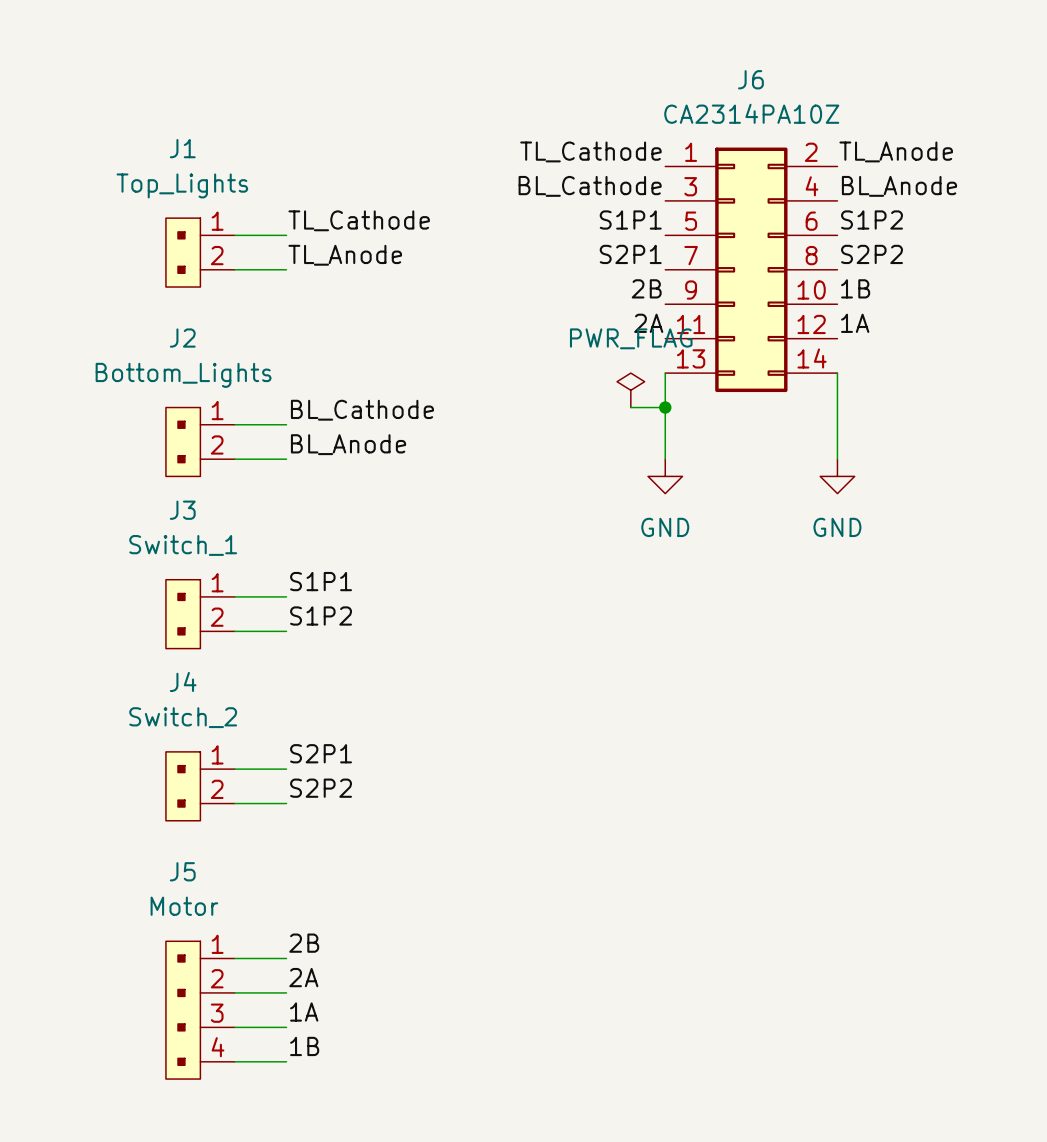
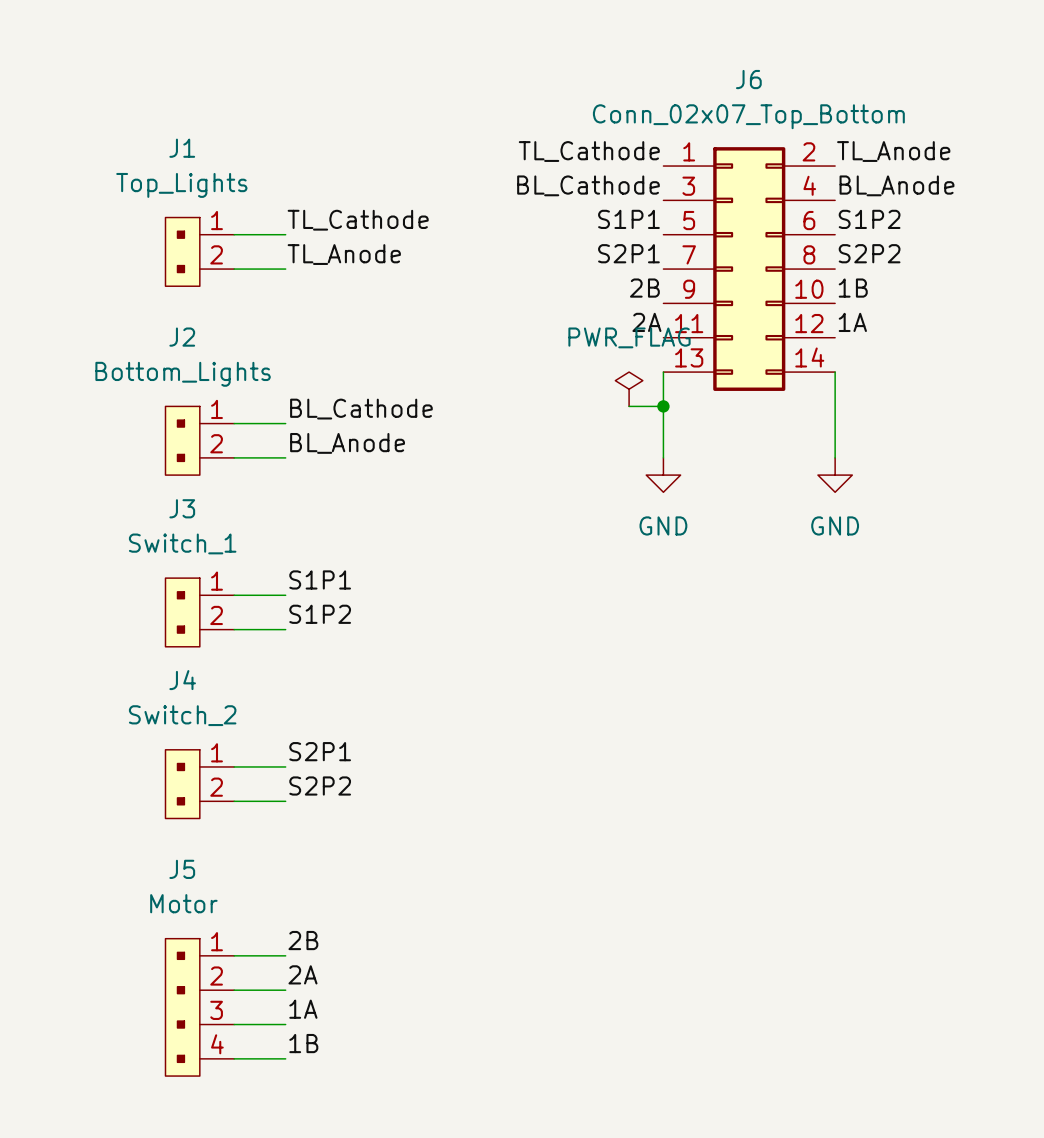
J6 value: CA2314PA10Z (751, 113) -> Conn_02x07_Top_Bottom (748, 116)

